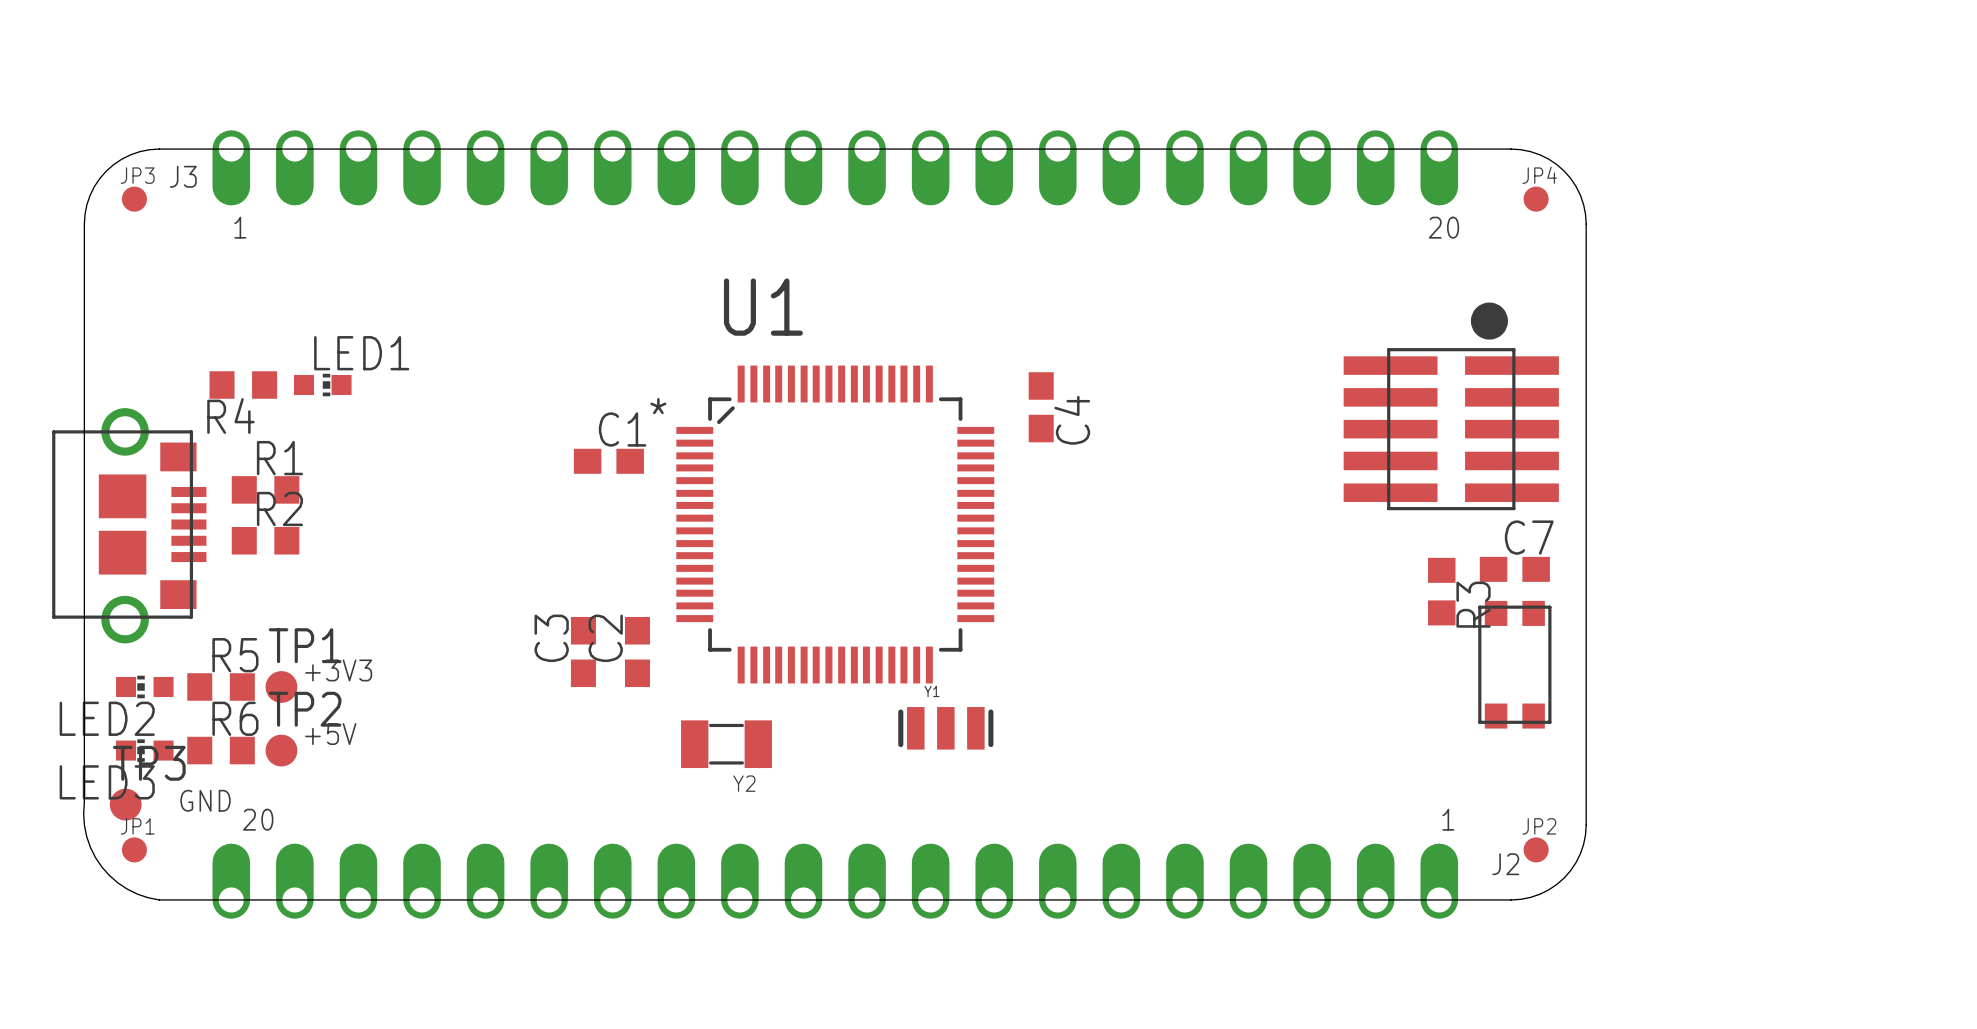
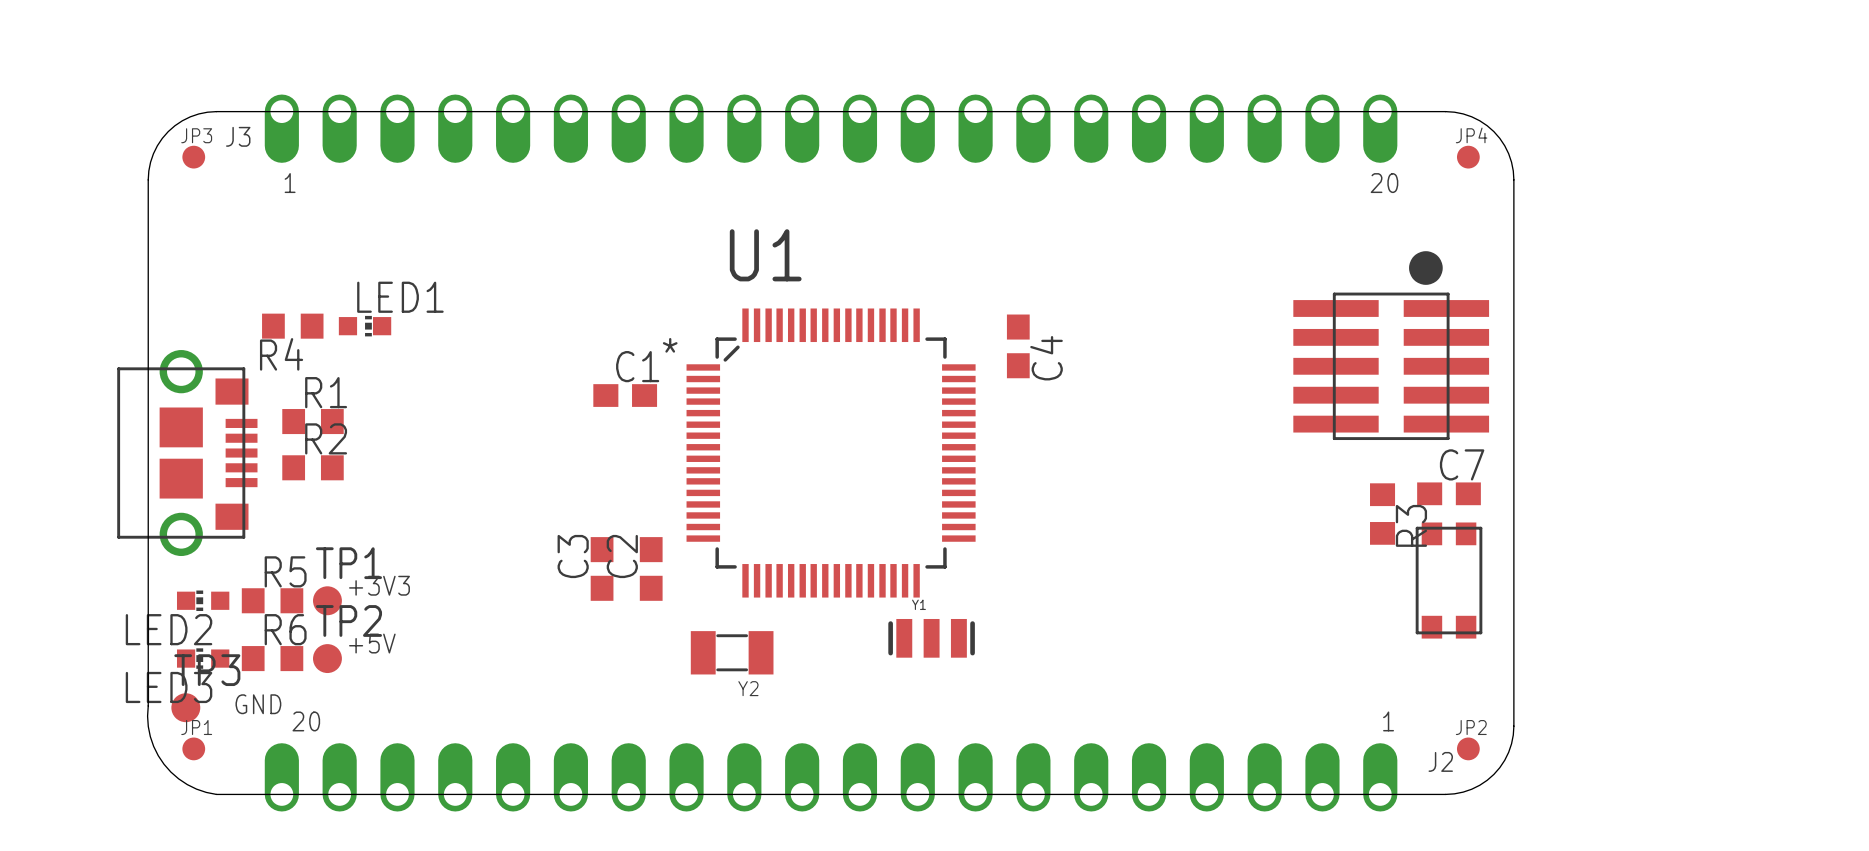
part footprint: [52, 408, 207, 644] -> [117, 350, 258, 557]

